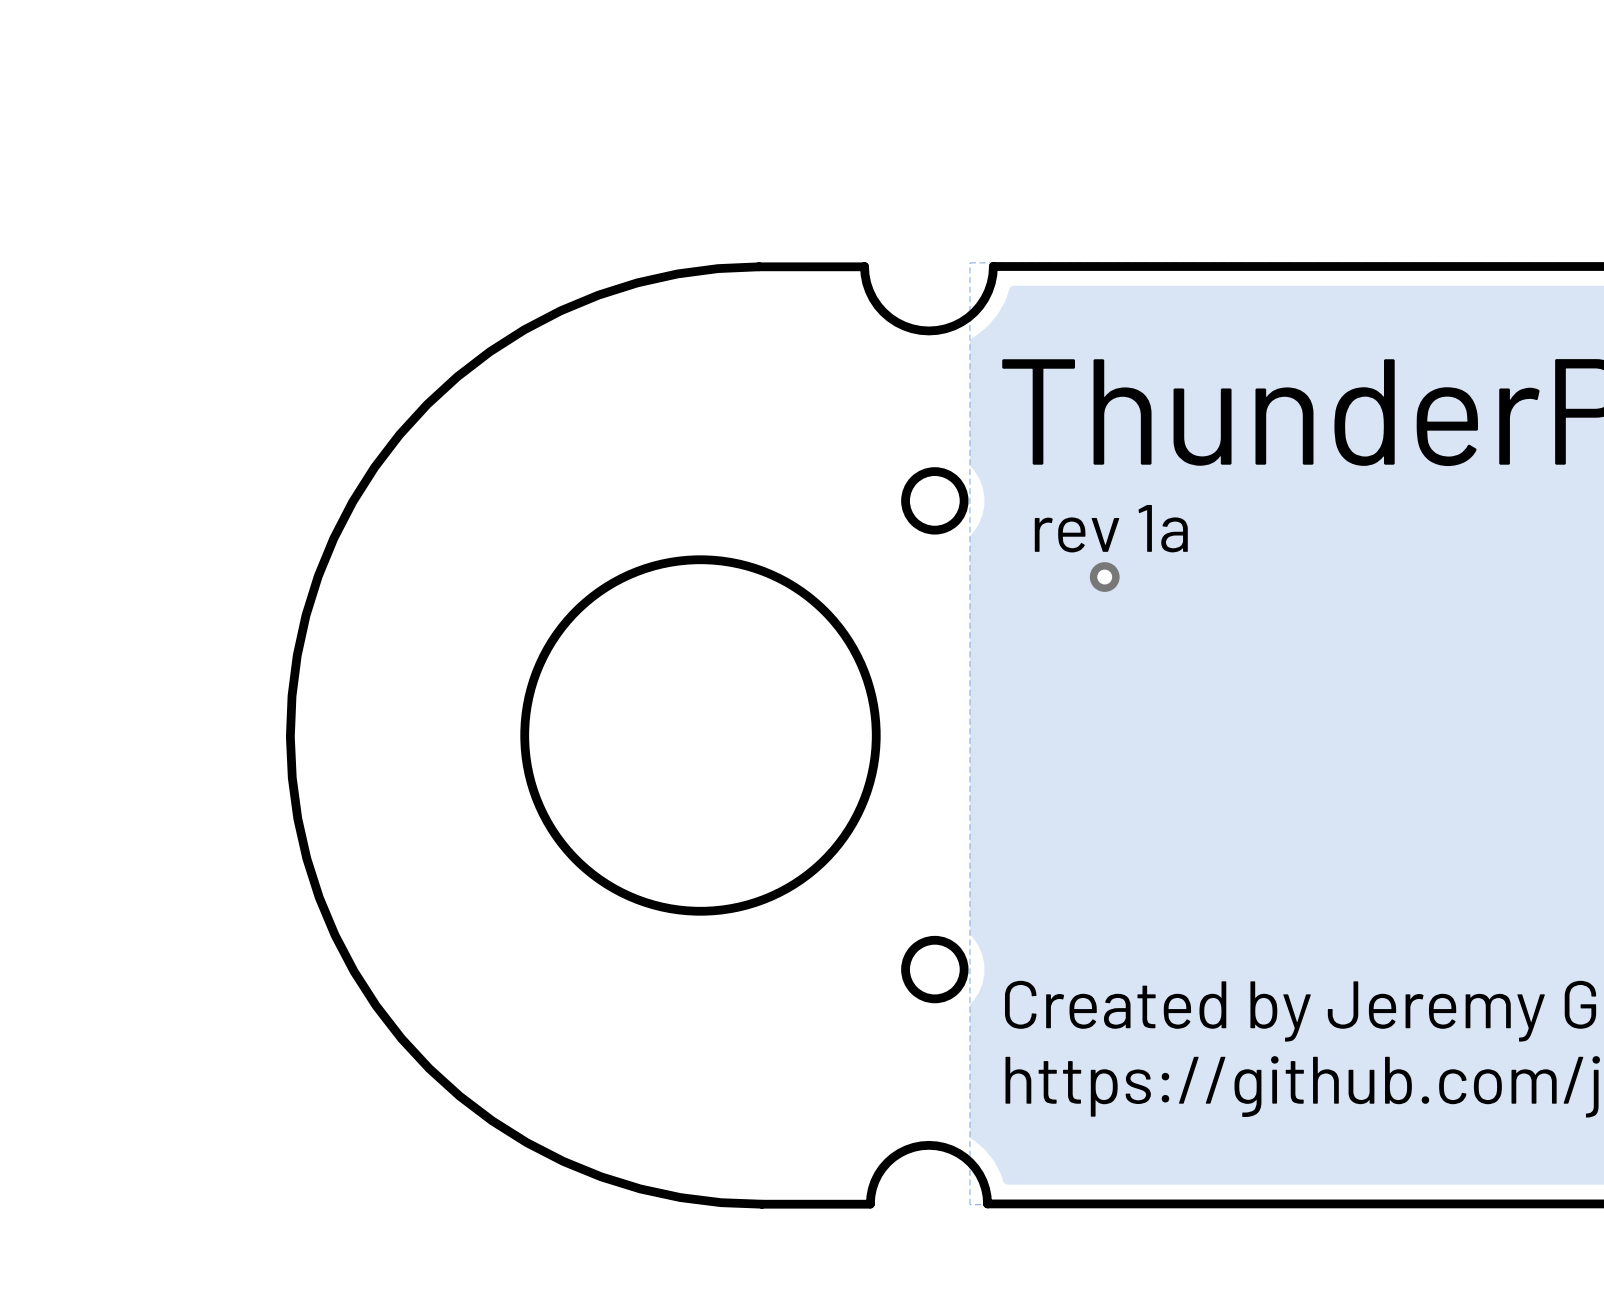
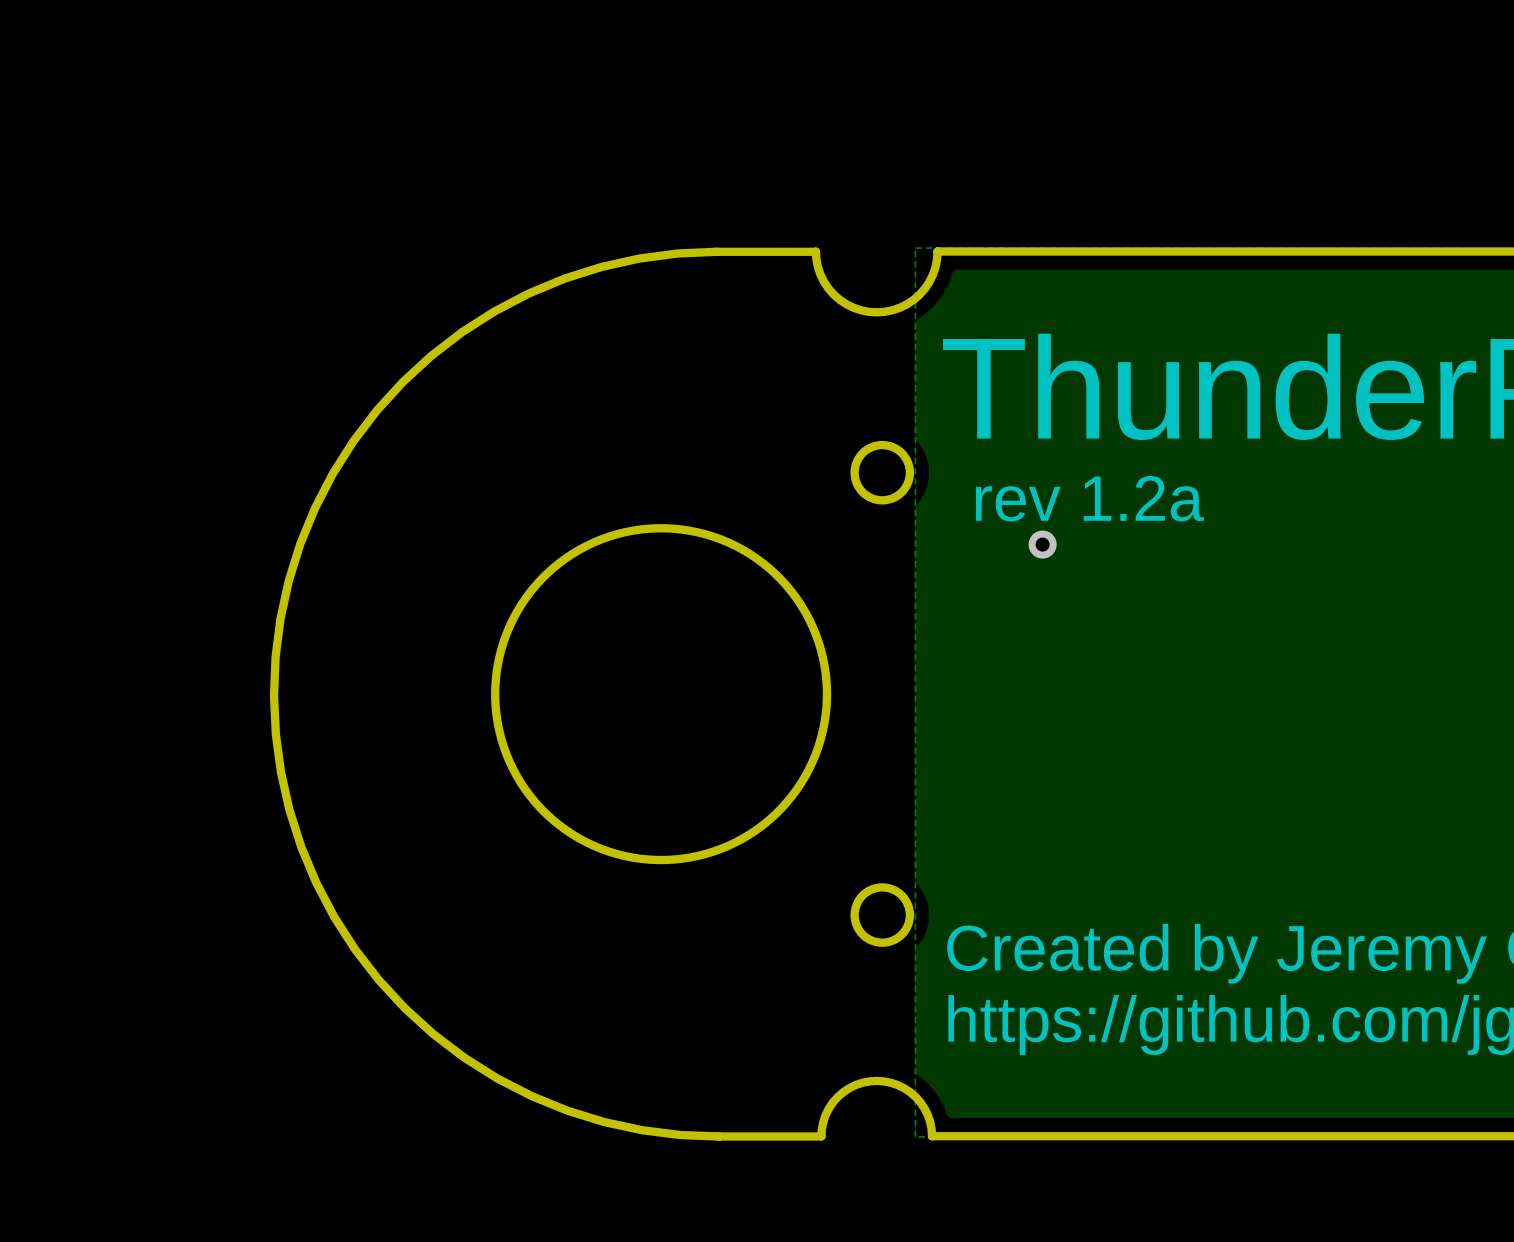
text: rev 1a (1111, 528) -> rev 1.2a (1089, 498)

